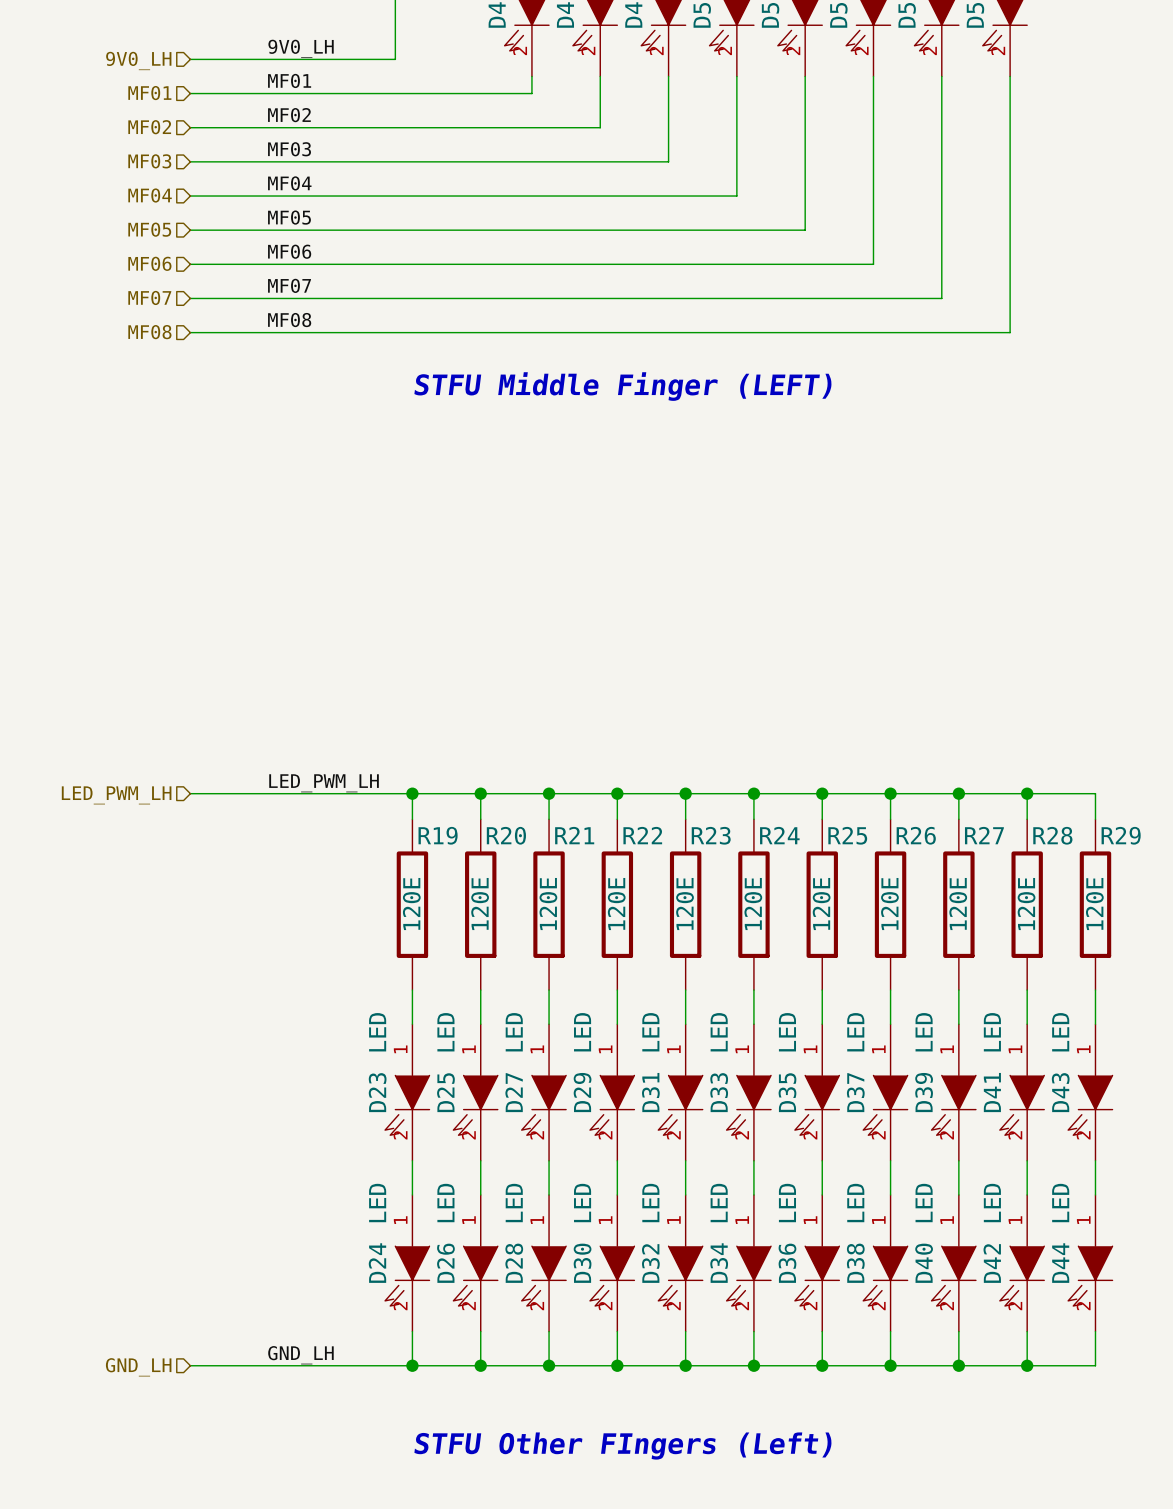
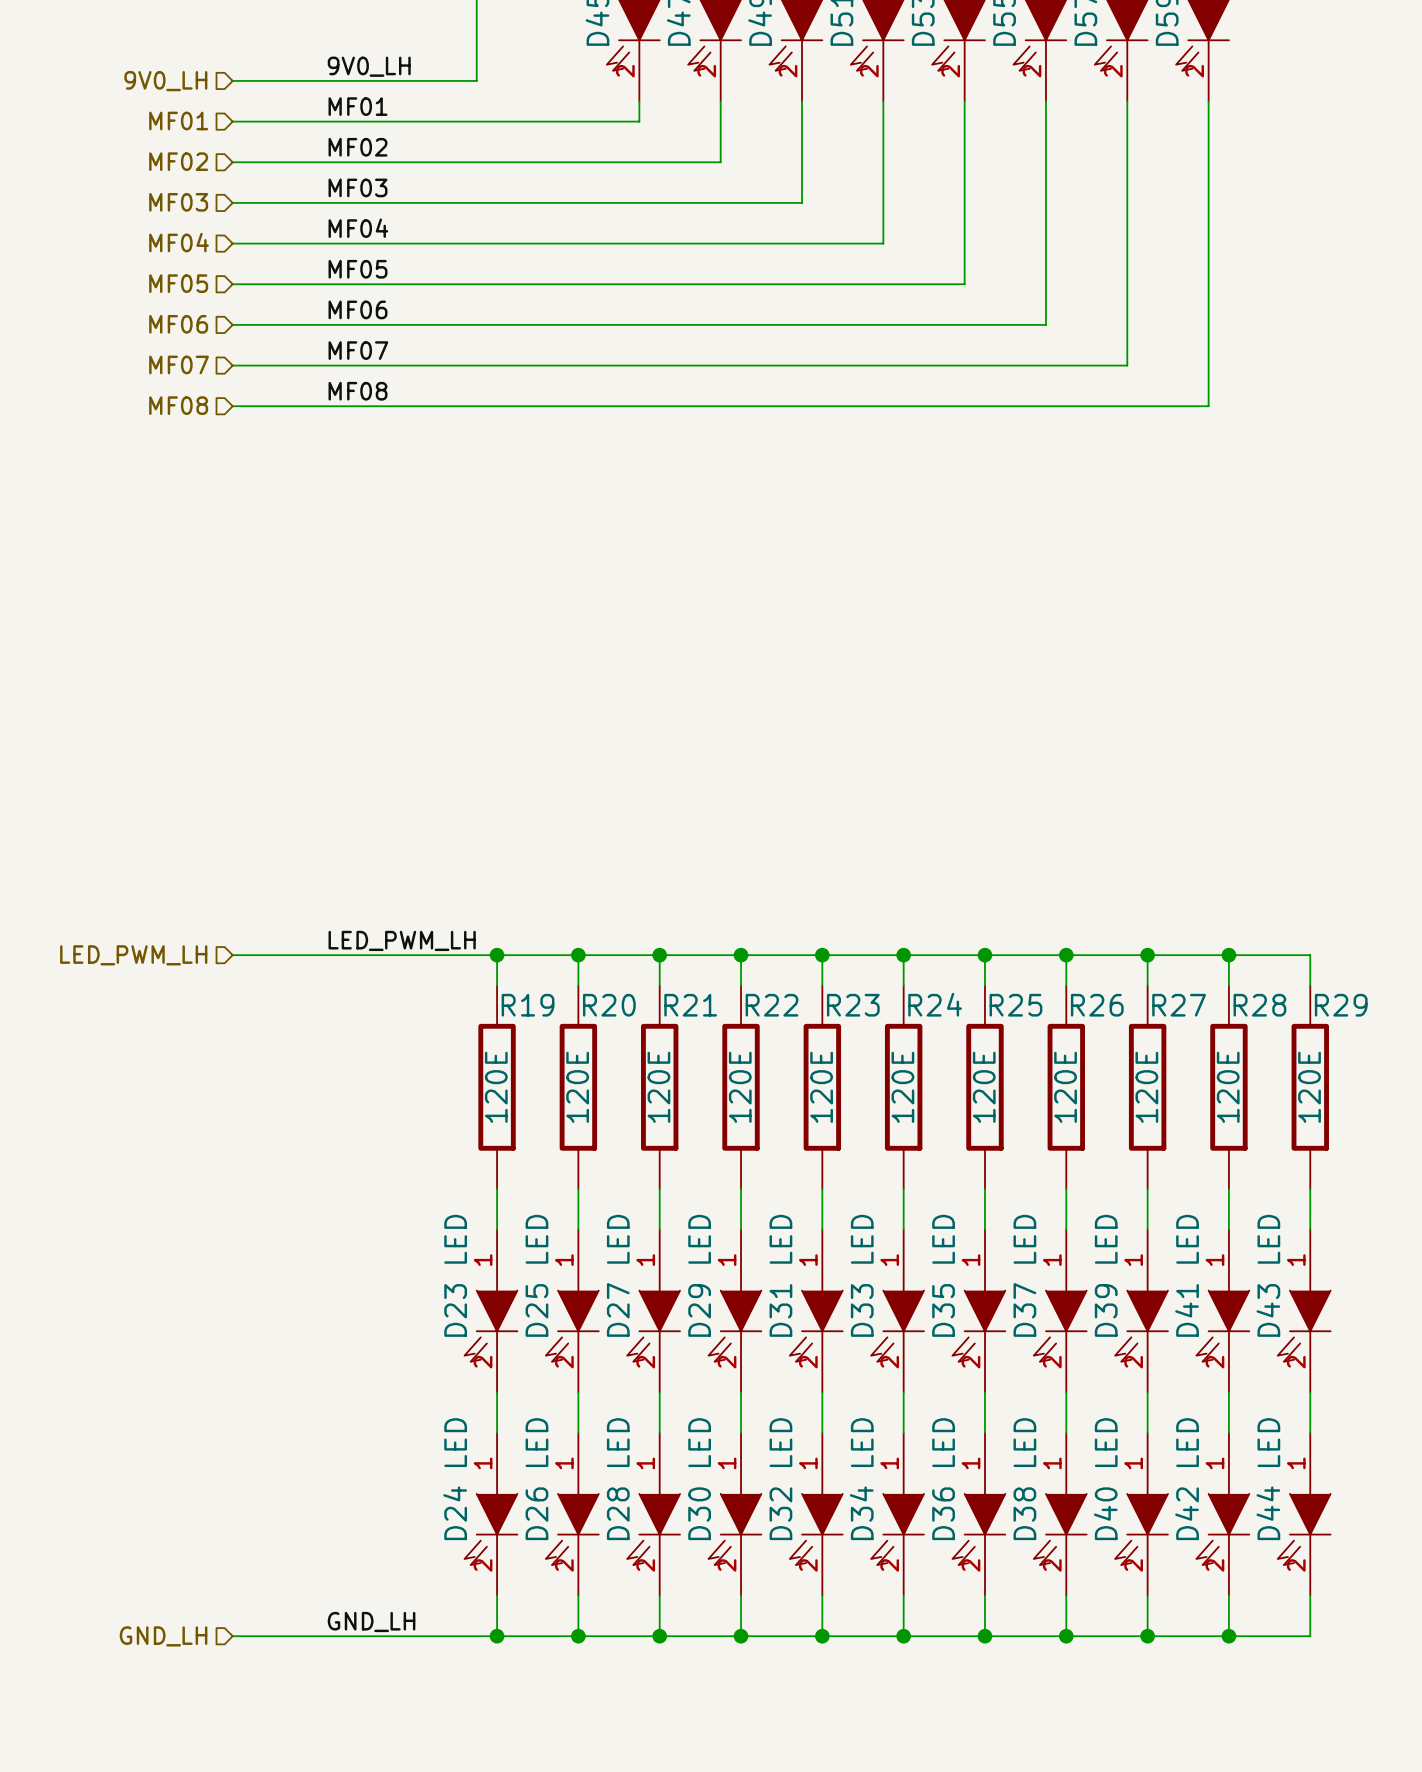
text: STFU Middle Finger (LEFT) (623, 386) -> none
text: STFU Other FIngers (Left) (623, 1446) -> none

